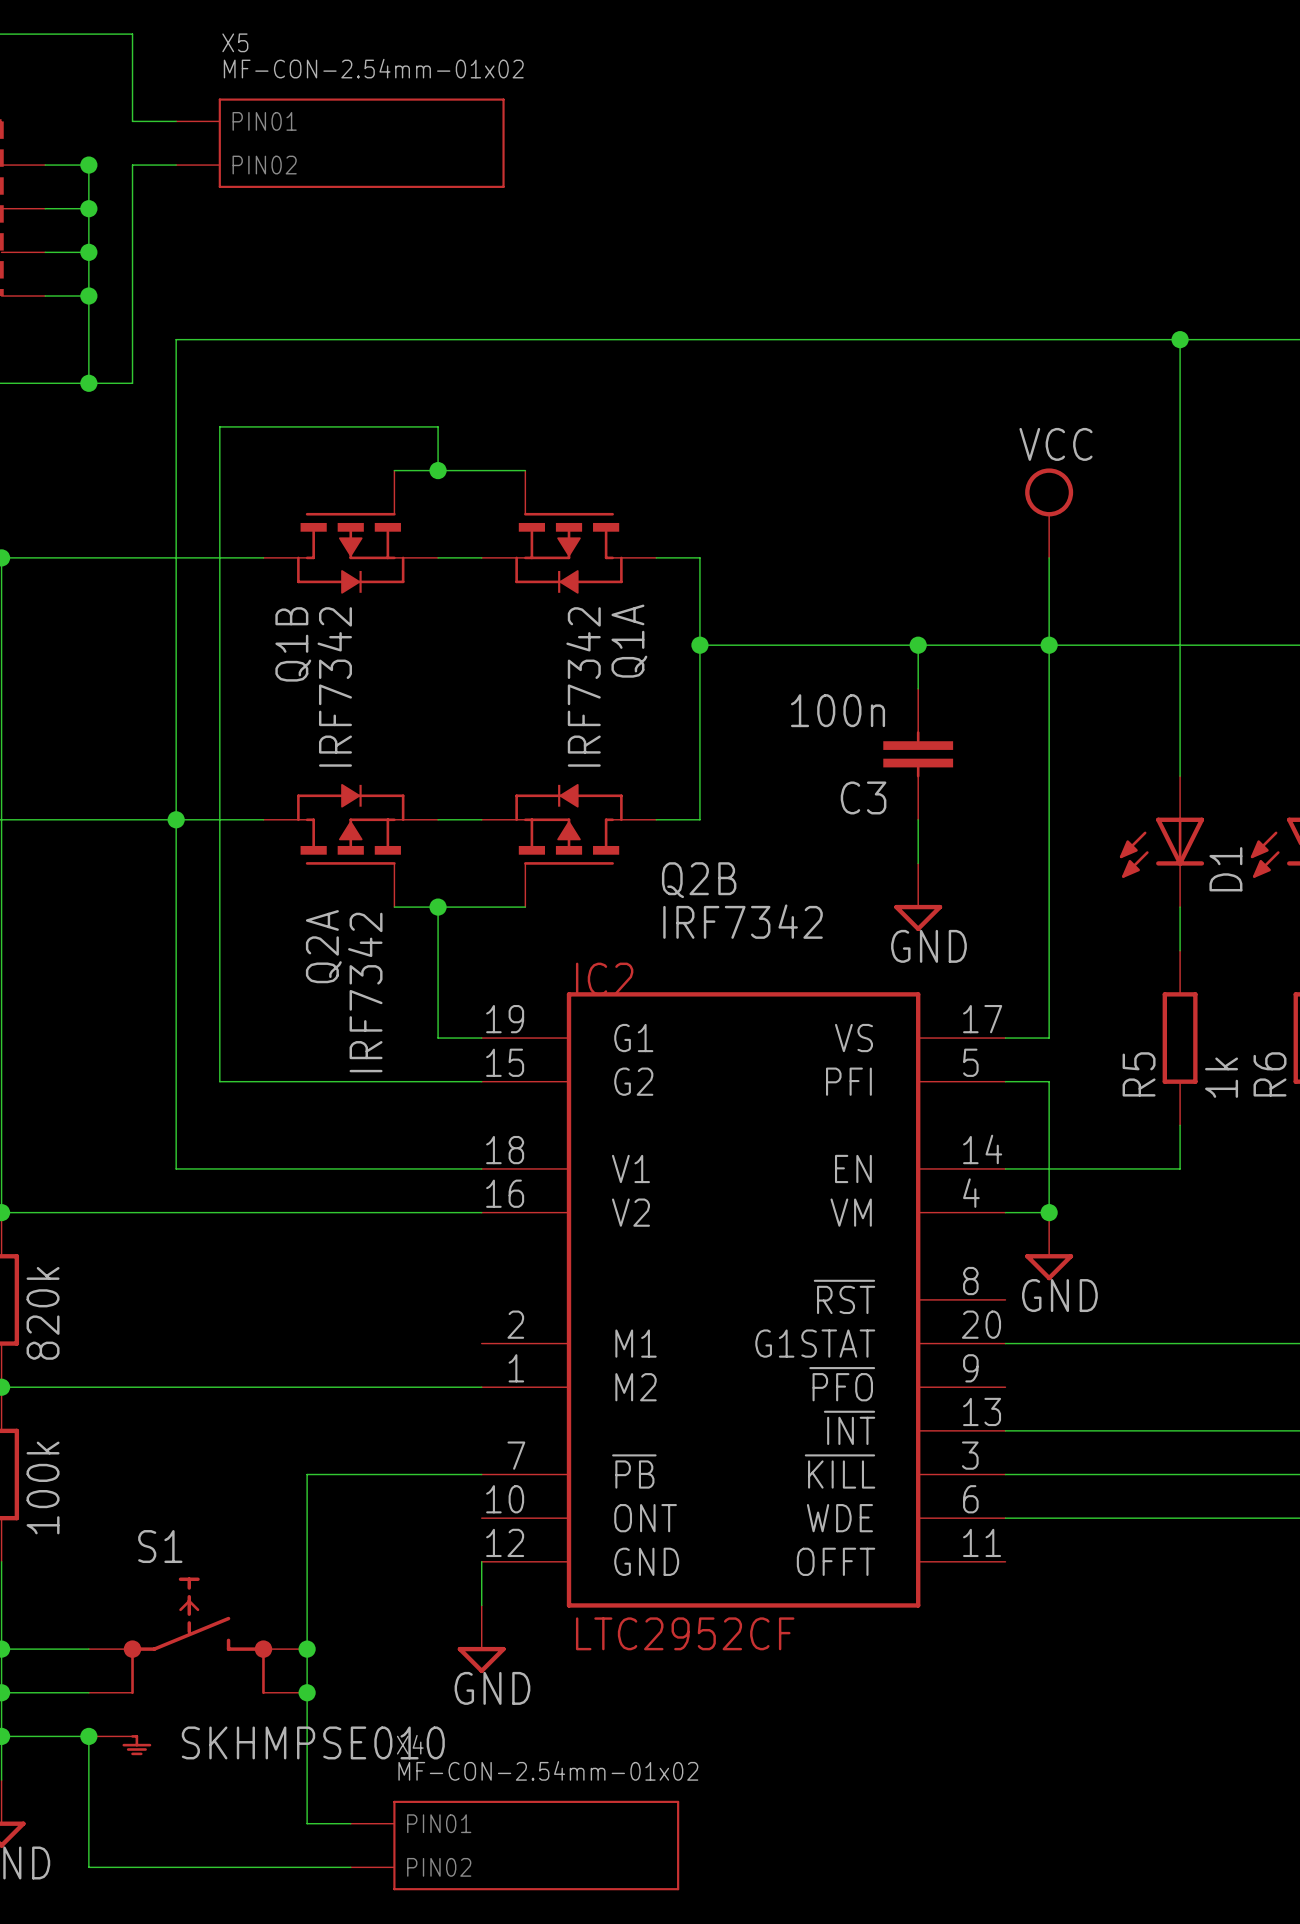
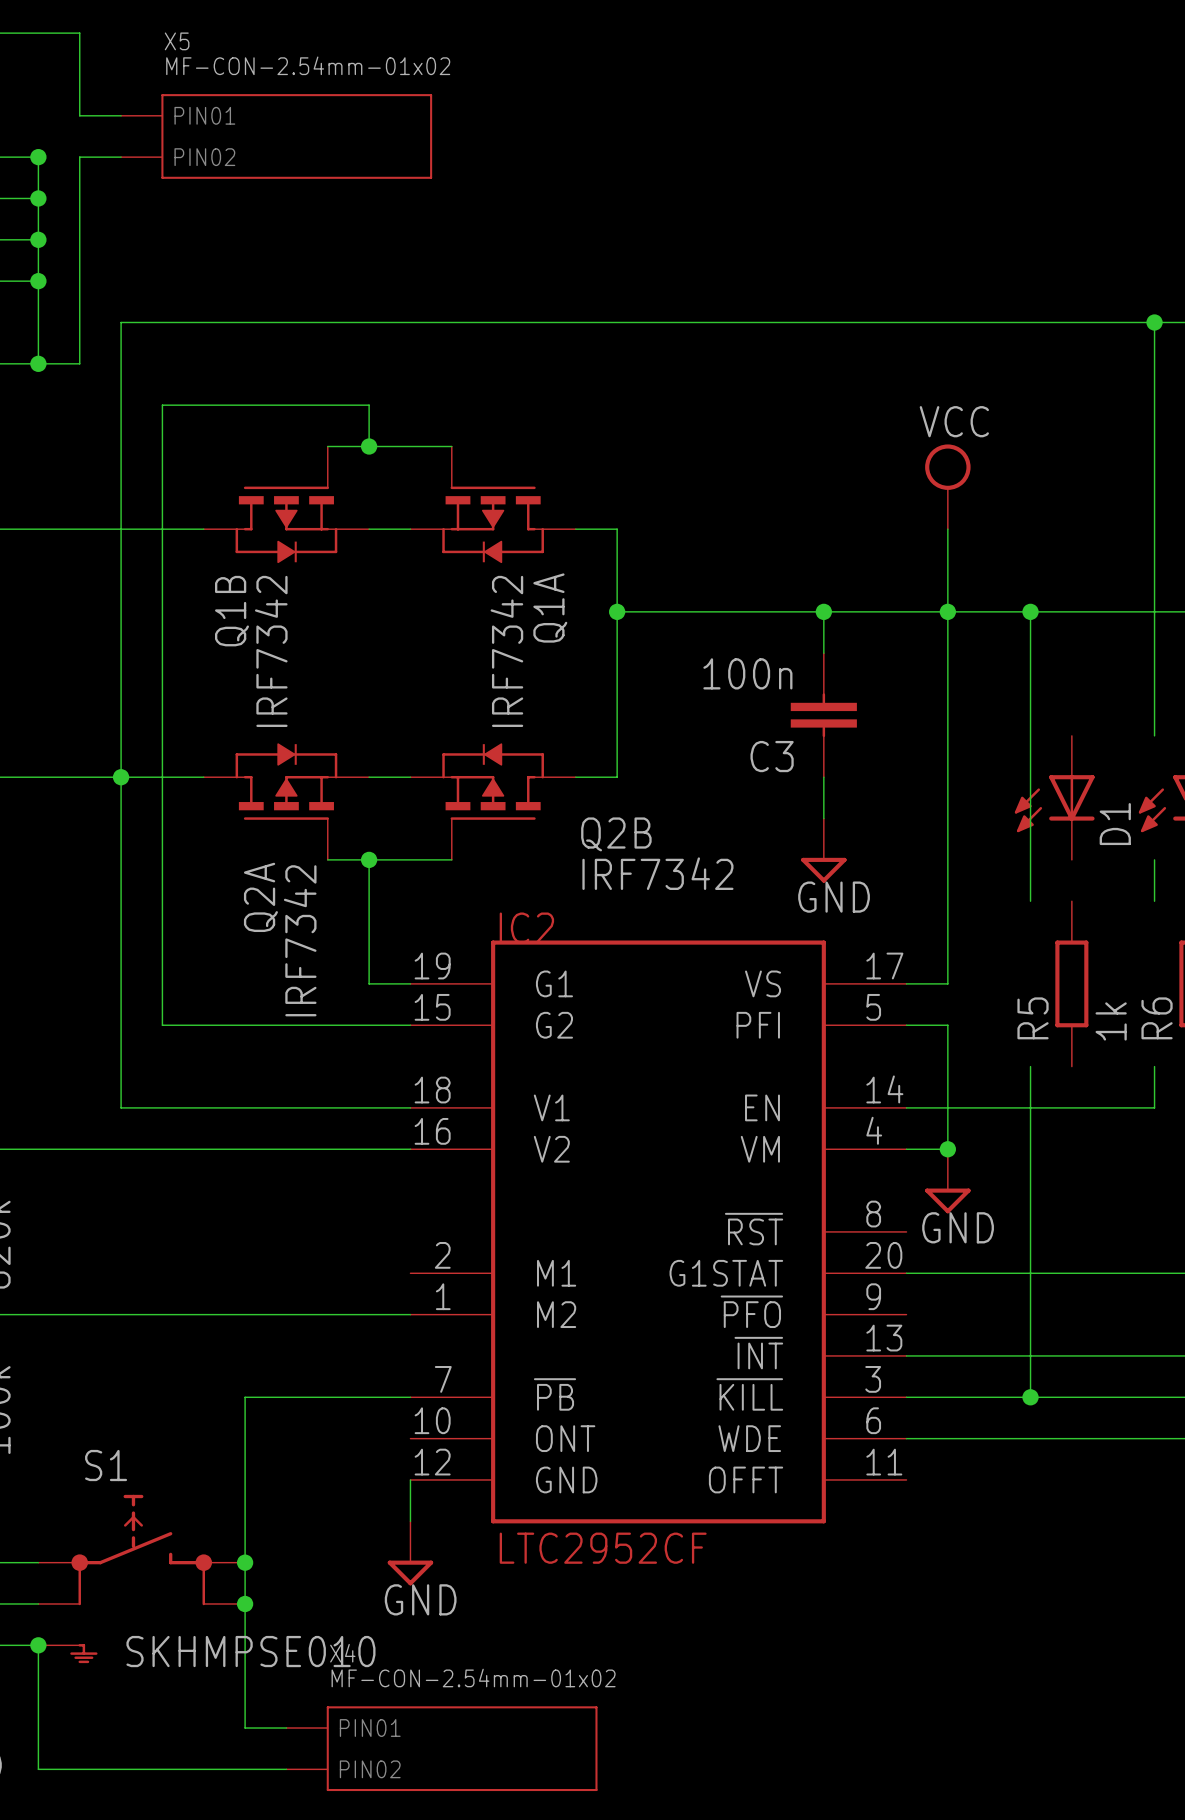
wire: (1180, 339) (1180, 776) -> (1154, 322) (1154, 735)
junction position: (1180, 339) -> (1154, 322)
wire: none -> (1030, 611) (1030, 901)
junction: none -> (1030, 611)
wire: (1180, 907) (1180, 950) -> (1154, 859) (1154, 901)
wire: none -> (1030, 1066) (1030, 1397)
wire: (1180, 1125) (1180, 1168) -> (1154, 1066) (1154, 1107) (1071, 1107)
junction: none -> (1030, 1397)

